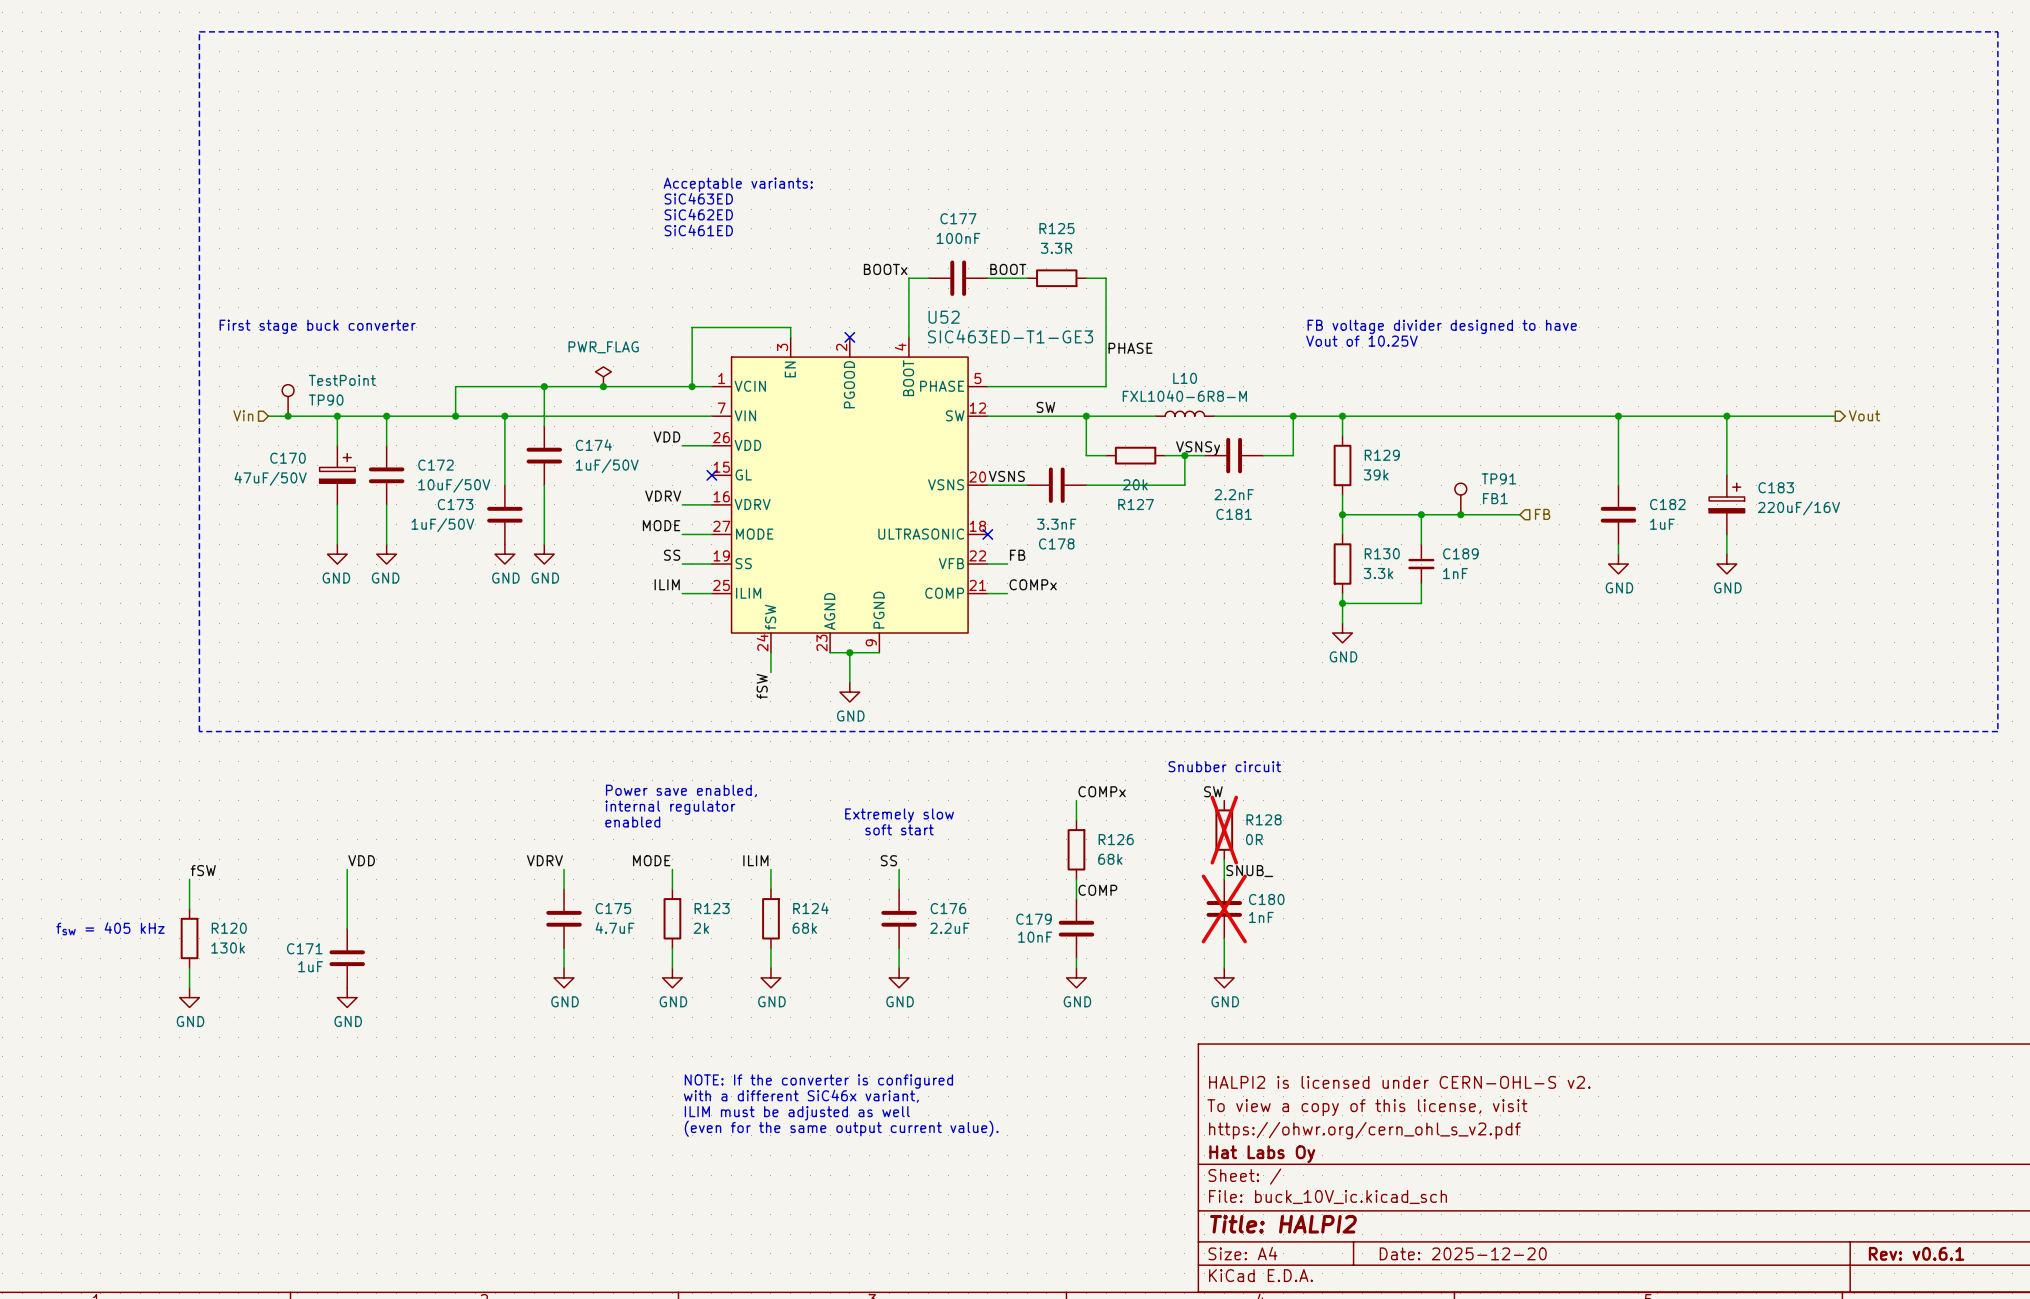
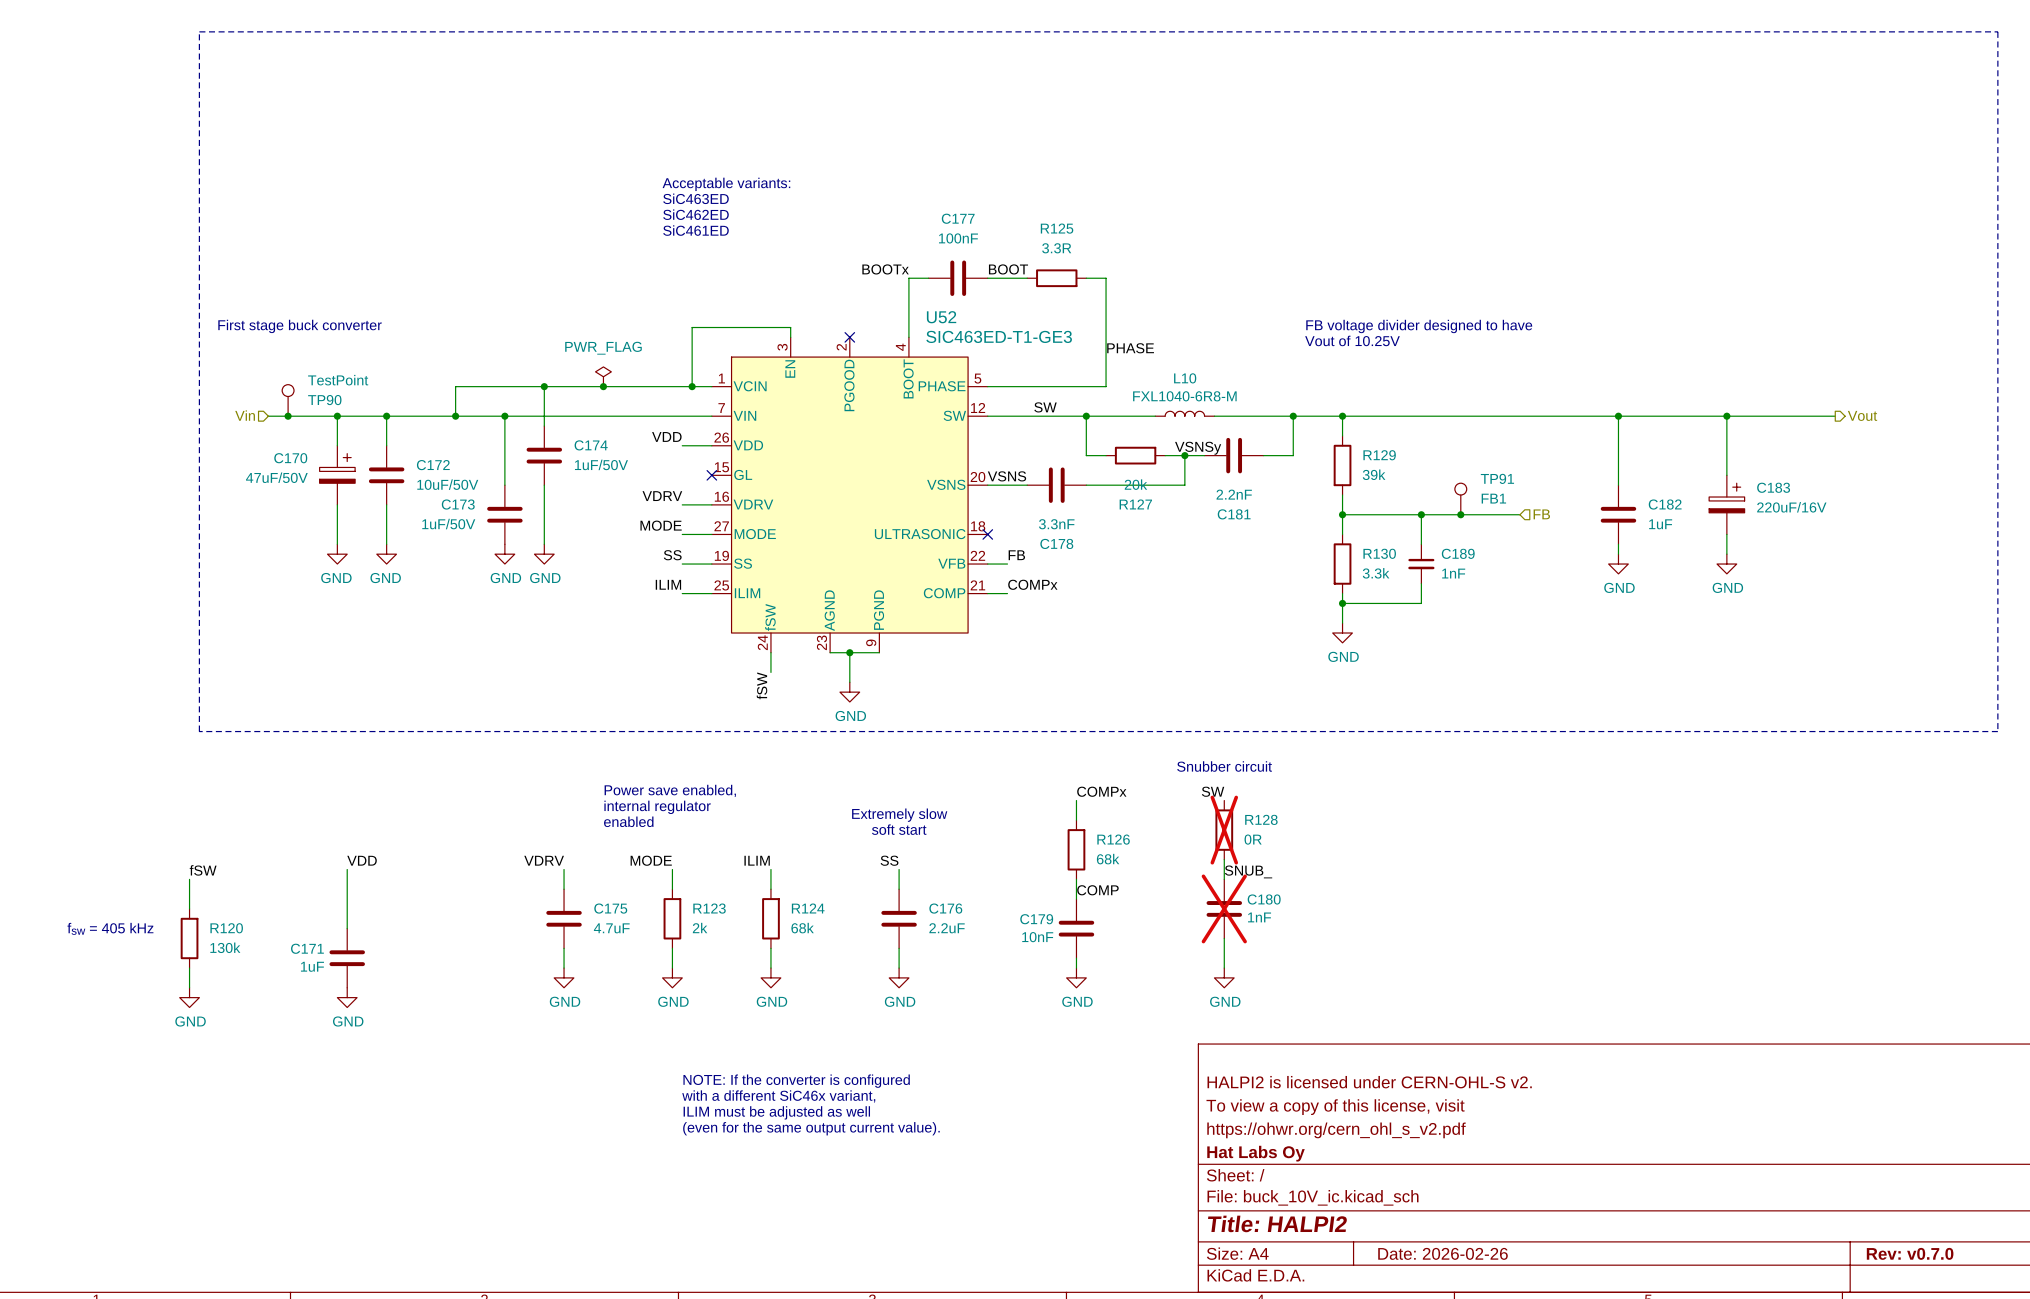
title block: Date: 2025-12-20 (1463, 1253) -> Date: 2026-02-26 (1443, 1253)
title block: Rev: v0.6.1 (1916, 1253) -> Rev: v0.7.0 (1910, 1253)

